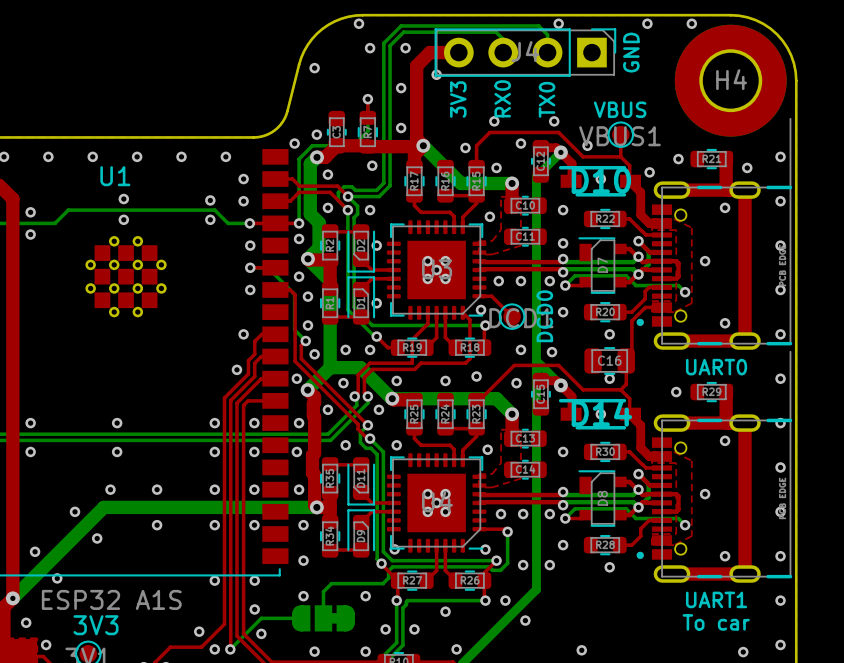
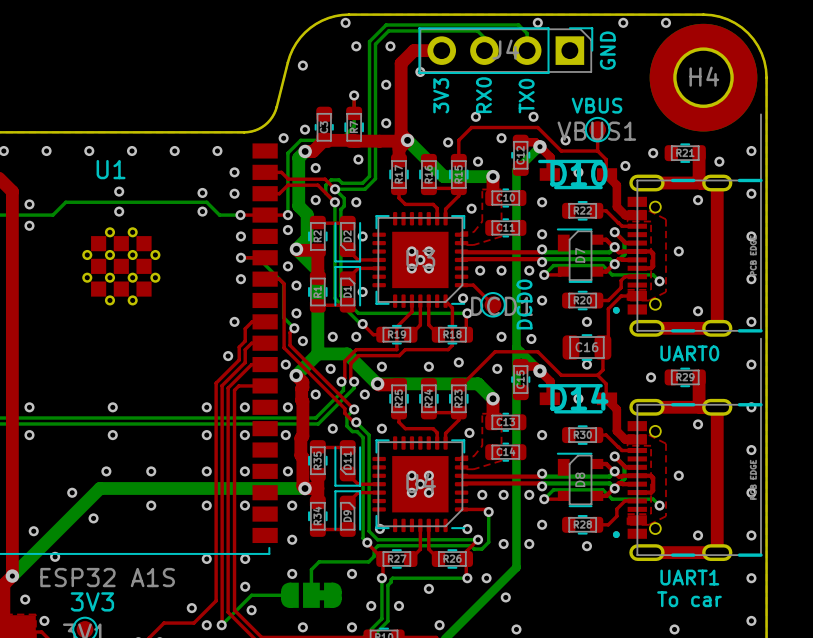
via: (581, 650) -> none
via: (743, 652) -> none
via: none -> (516, 629)
via: none -> (674, 629)

